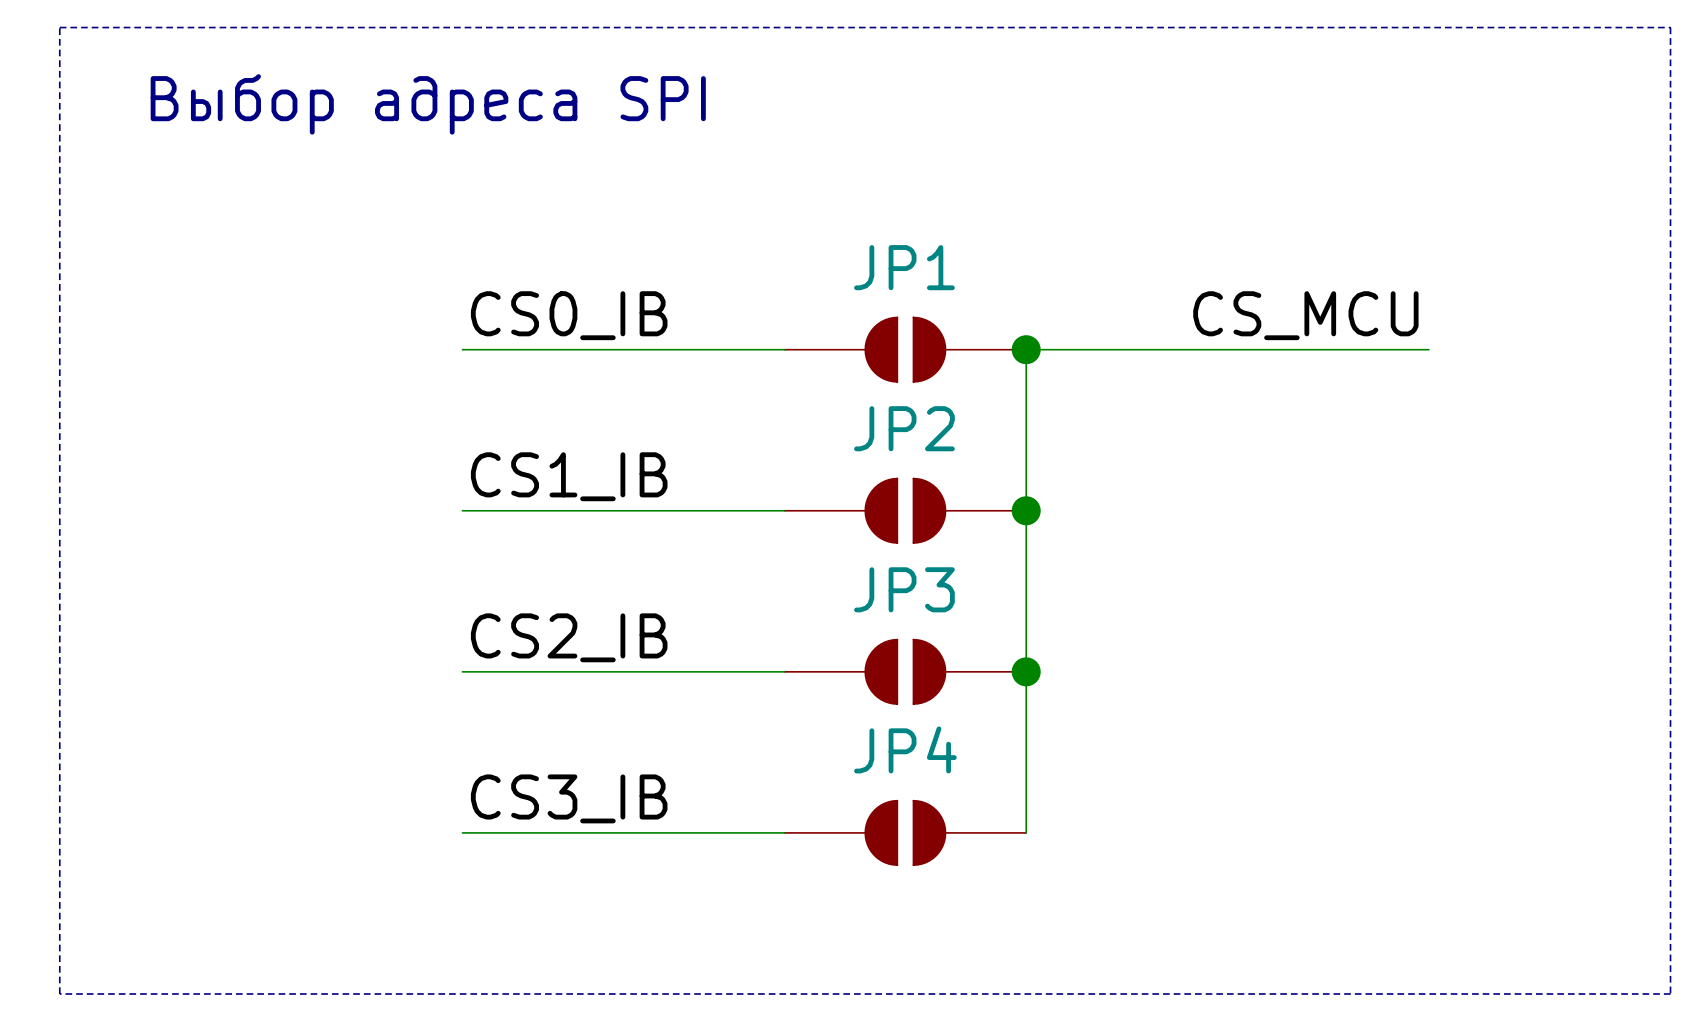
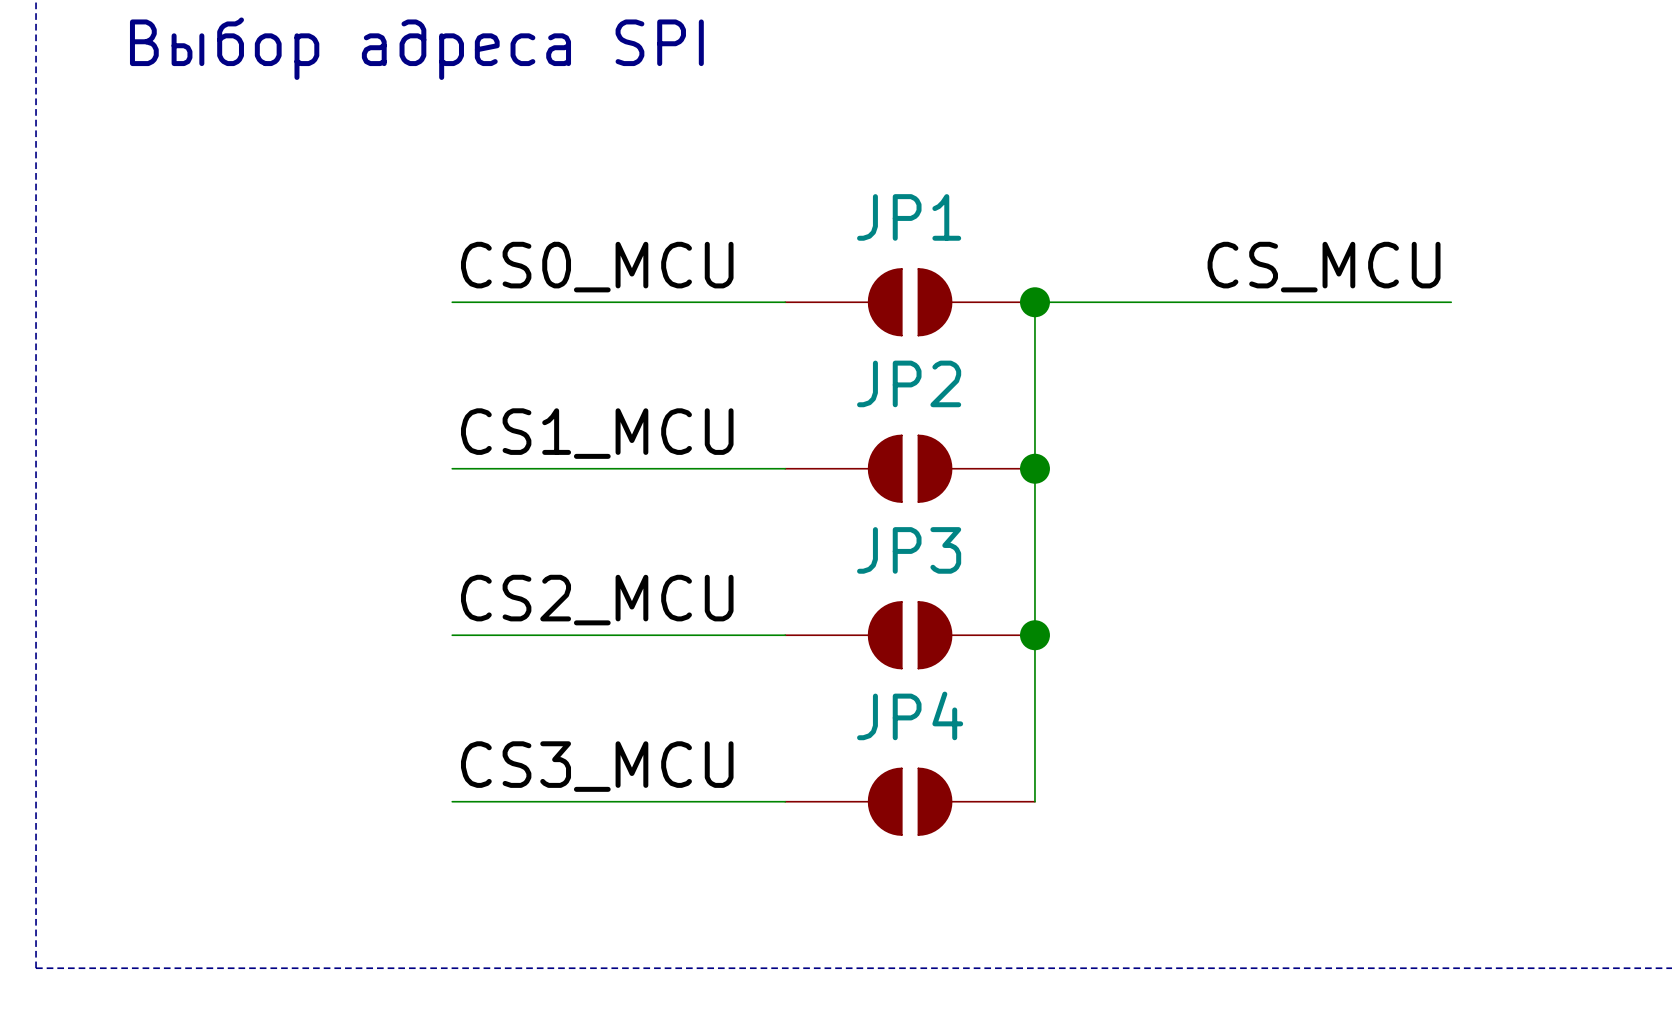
label: CS0_IB (569, 315) -> CS0_MCU (597, 267)
label: CS1_IB (569, 476) -> CS1_MCU (597, 433)
label: CS2_IB (569, 637) -> CS2_MCU (597, 600)
label: CS3_IB (569, 798) -> CS3_MCU (597, 766)

